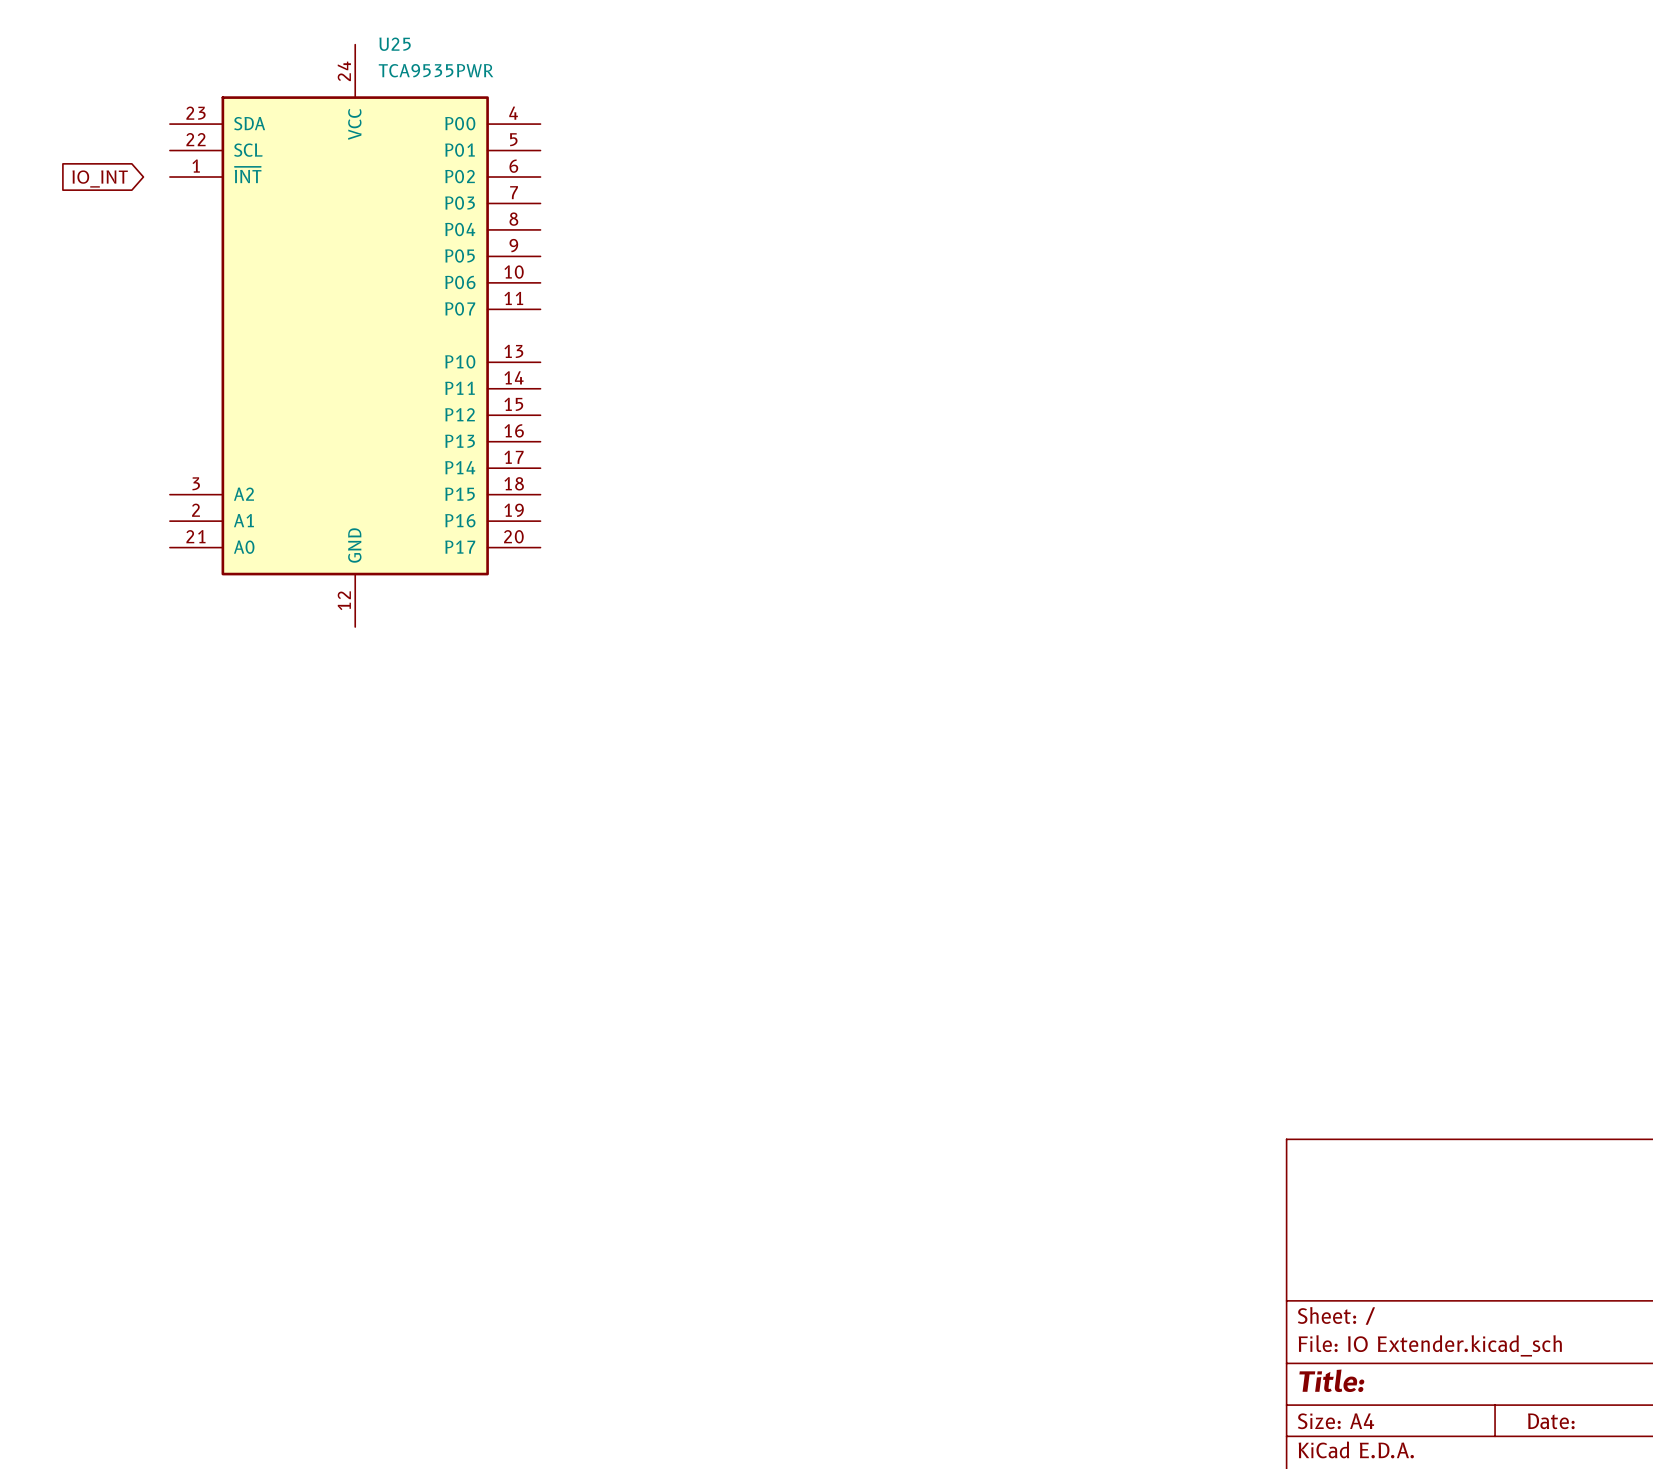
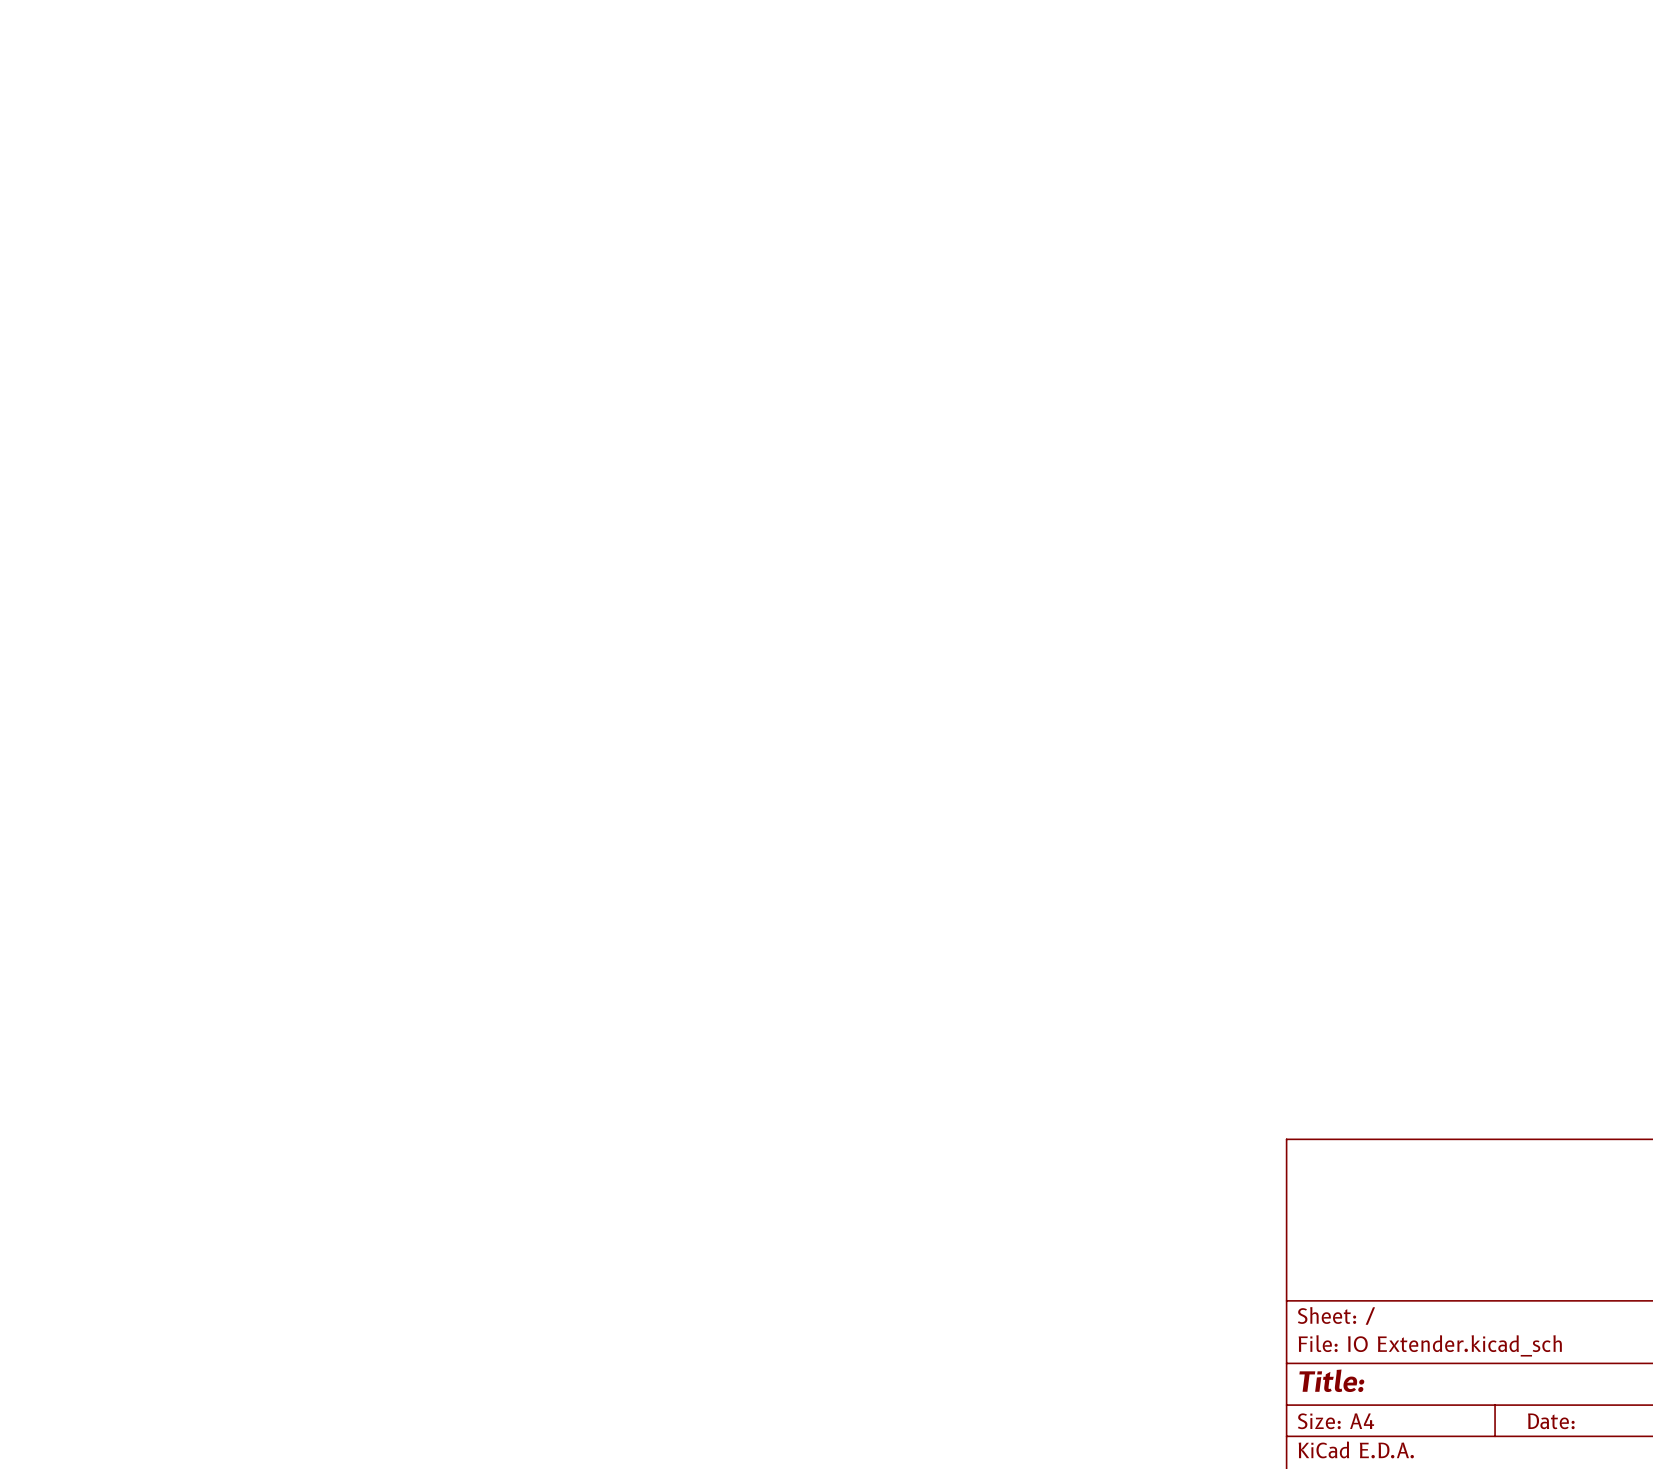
global label: IO_INT (100, 178) -> none
U25: TCA9535PWR (355, 335) -> none

